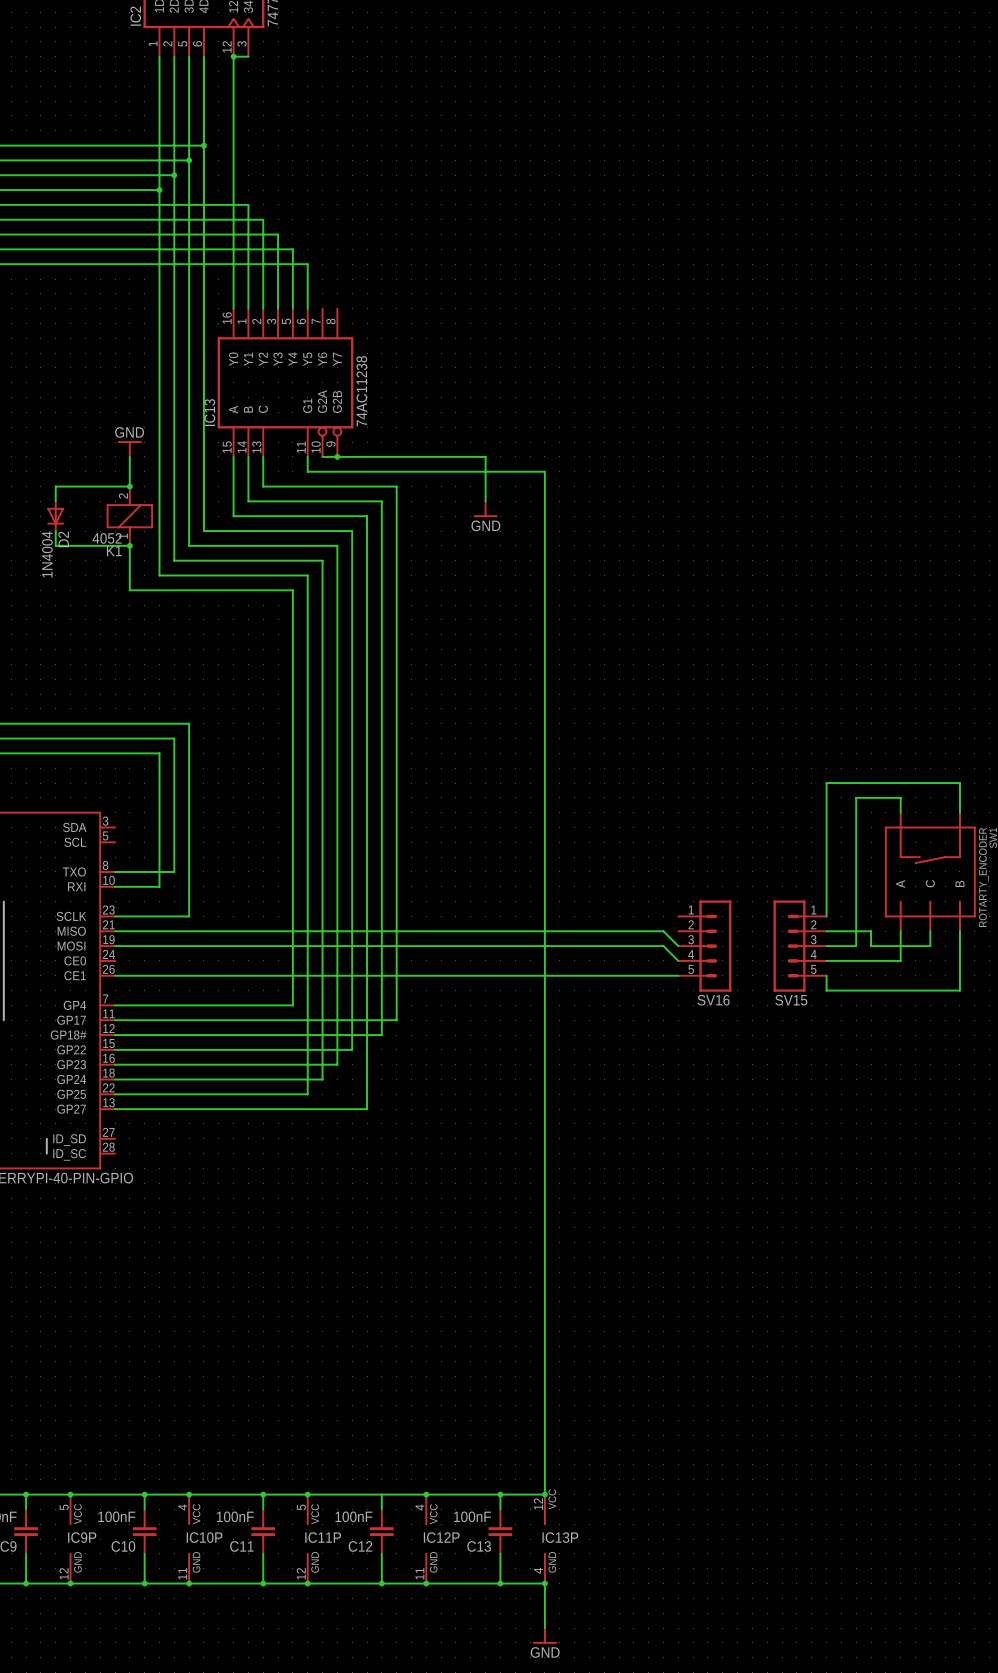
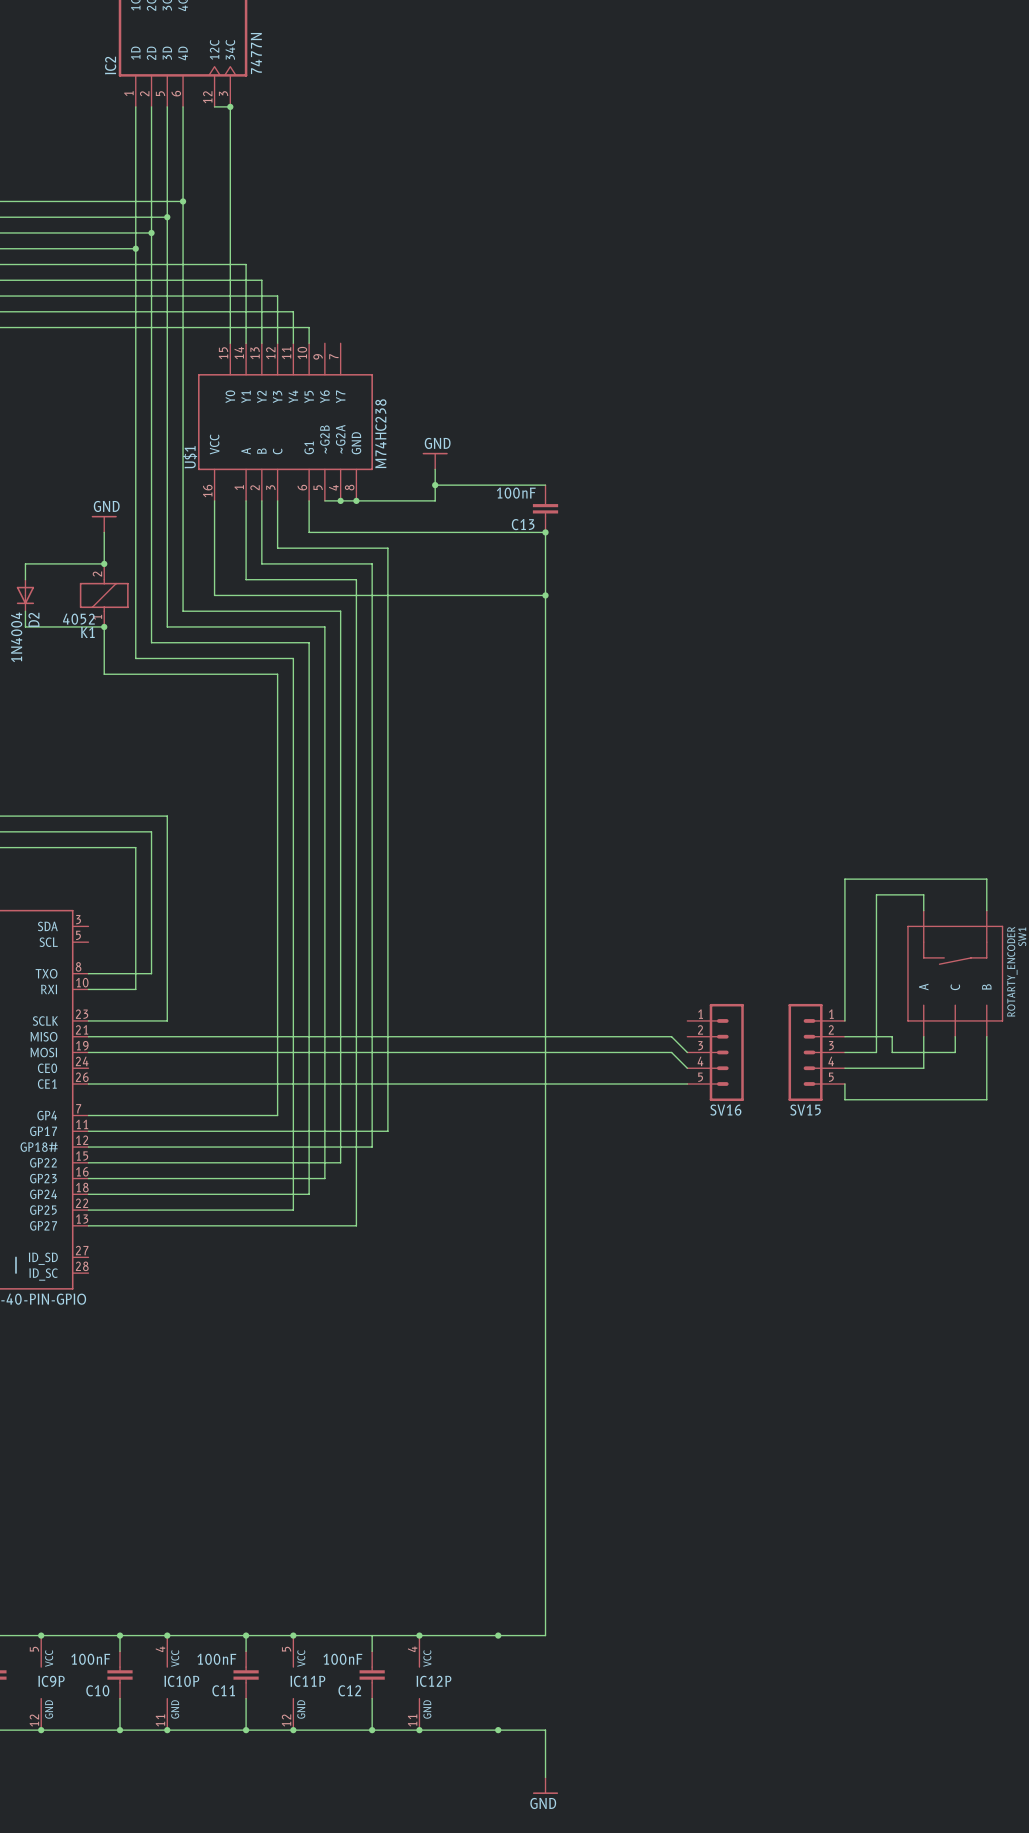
wire: (233, 56) (233, 308) -> none
junction position: (233, 56) -> (230, 106)
wire: none -> (230, 106) (230, 264) (246, 264) (246, 280) (261, 280) (261, 296) (277, 296) (277, 311) (293, 311) (293, 327) (309, 327) (309, 343)
U$1: none -> M74HC238 (285, 422)
IC13: 74AC11238 (285, 382) -> none
wire: none -> (435, 469) (435, 500) (324, 500)
wire: none -> (435, 485) (545, 485)
junction: none -> (435, 485)
wire: none -> (261, 500) (261, 563)
junction: none -> (340, 500)
junction: none -> (356, 500)
wire: (248, 456) (248, 501) (263, 501) -> none
wire: (307, 456) (307, 471) -> (277, 500) (277, 548) (293, 548)
junction: (337, 456) -> none
wire: (485, 456) (485, 501) -> (482, 532) (545, 532) (545, 548)
junction: none -> (545, 532)
wire: (396, 471) (544, 471) -> none
wire: (263, 486) (278, 486) -> (246, 563) (246, 579)
wire: (381, 486) (396, 486) -> (387, 548) (387, 563)
wire: (367, 501) (381, 501) -> (372, 563) (372, 579)
wire: none -> (356, 579) (356, 595) (545, 595)
power symbol position: GND (485, 509) -> GND (435, 461)
power symbol rotation: 0° (485, 516) -> 180° (435, 453)
junction: none -> (545, 595)
wire: (500, 1494) (500, 1509) -> none
junction: (544, 1494) -> none
C13 position: (500, 1531) -> (545, 508)
IC13P: (544, 1539) -> none
wire: (500, 1553) (500, 1583) -> none
junction: (544, 1583) -> none

